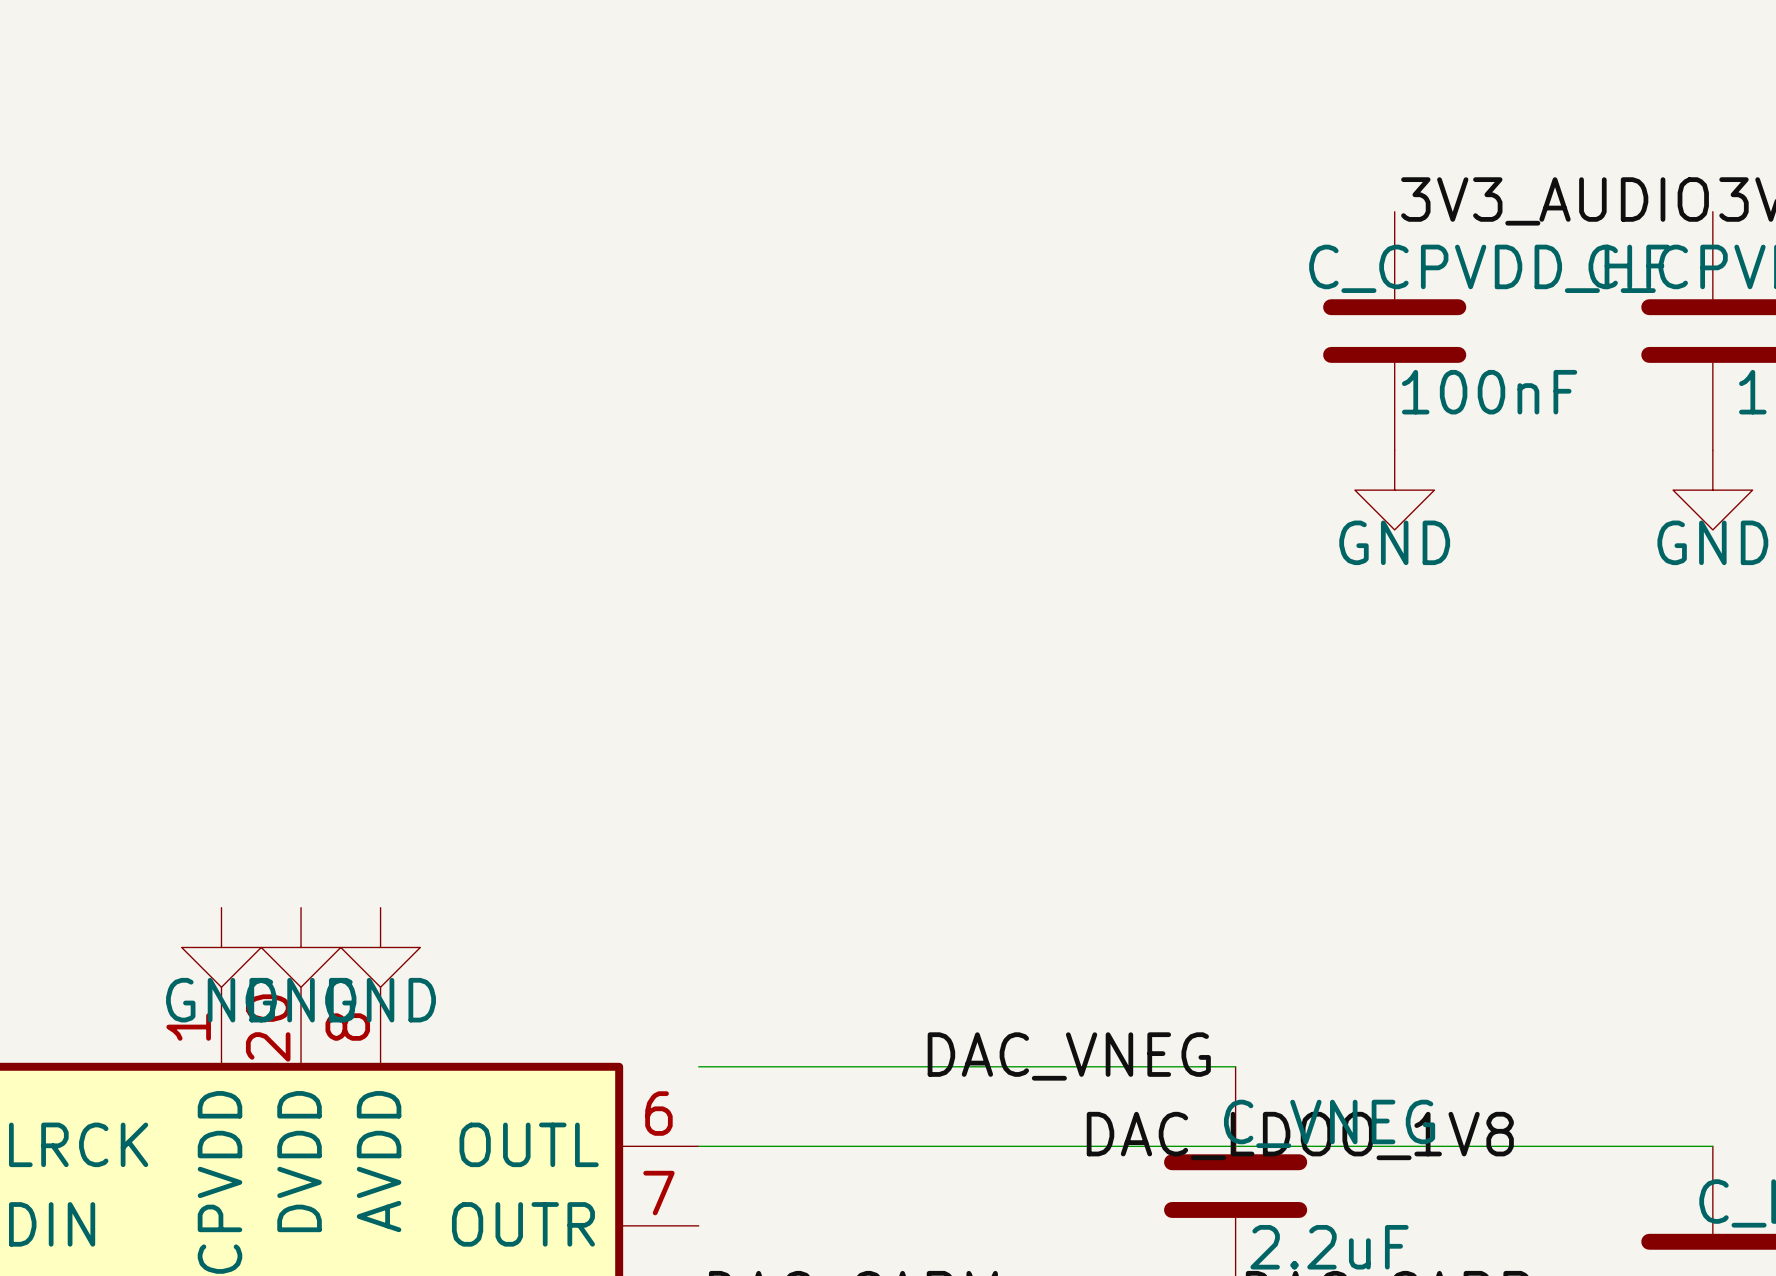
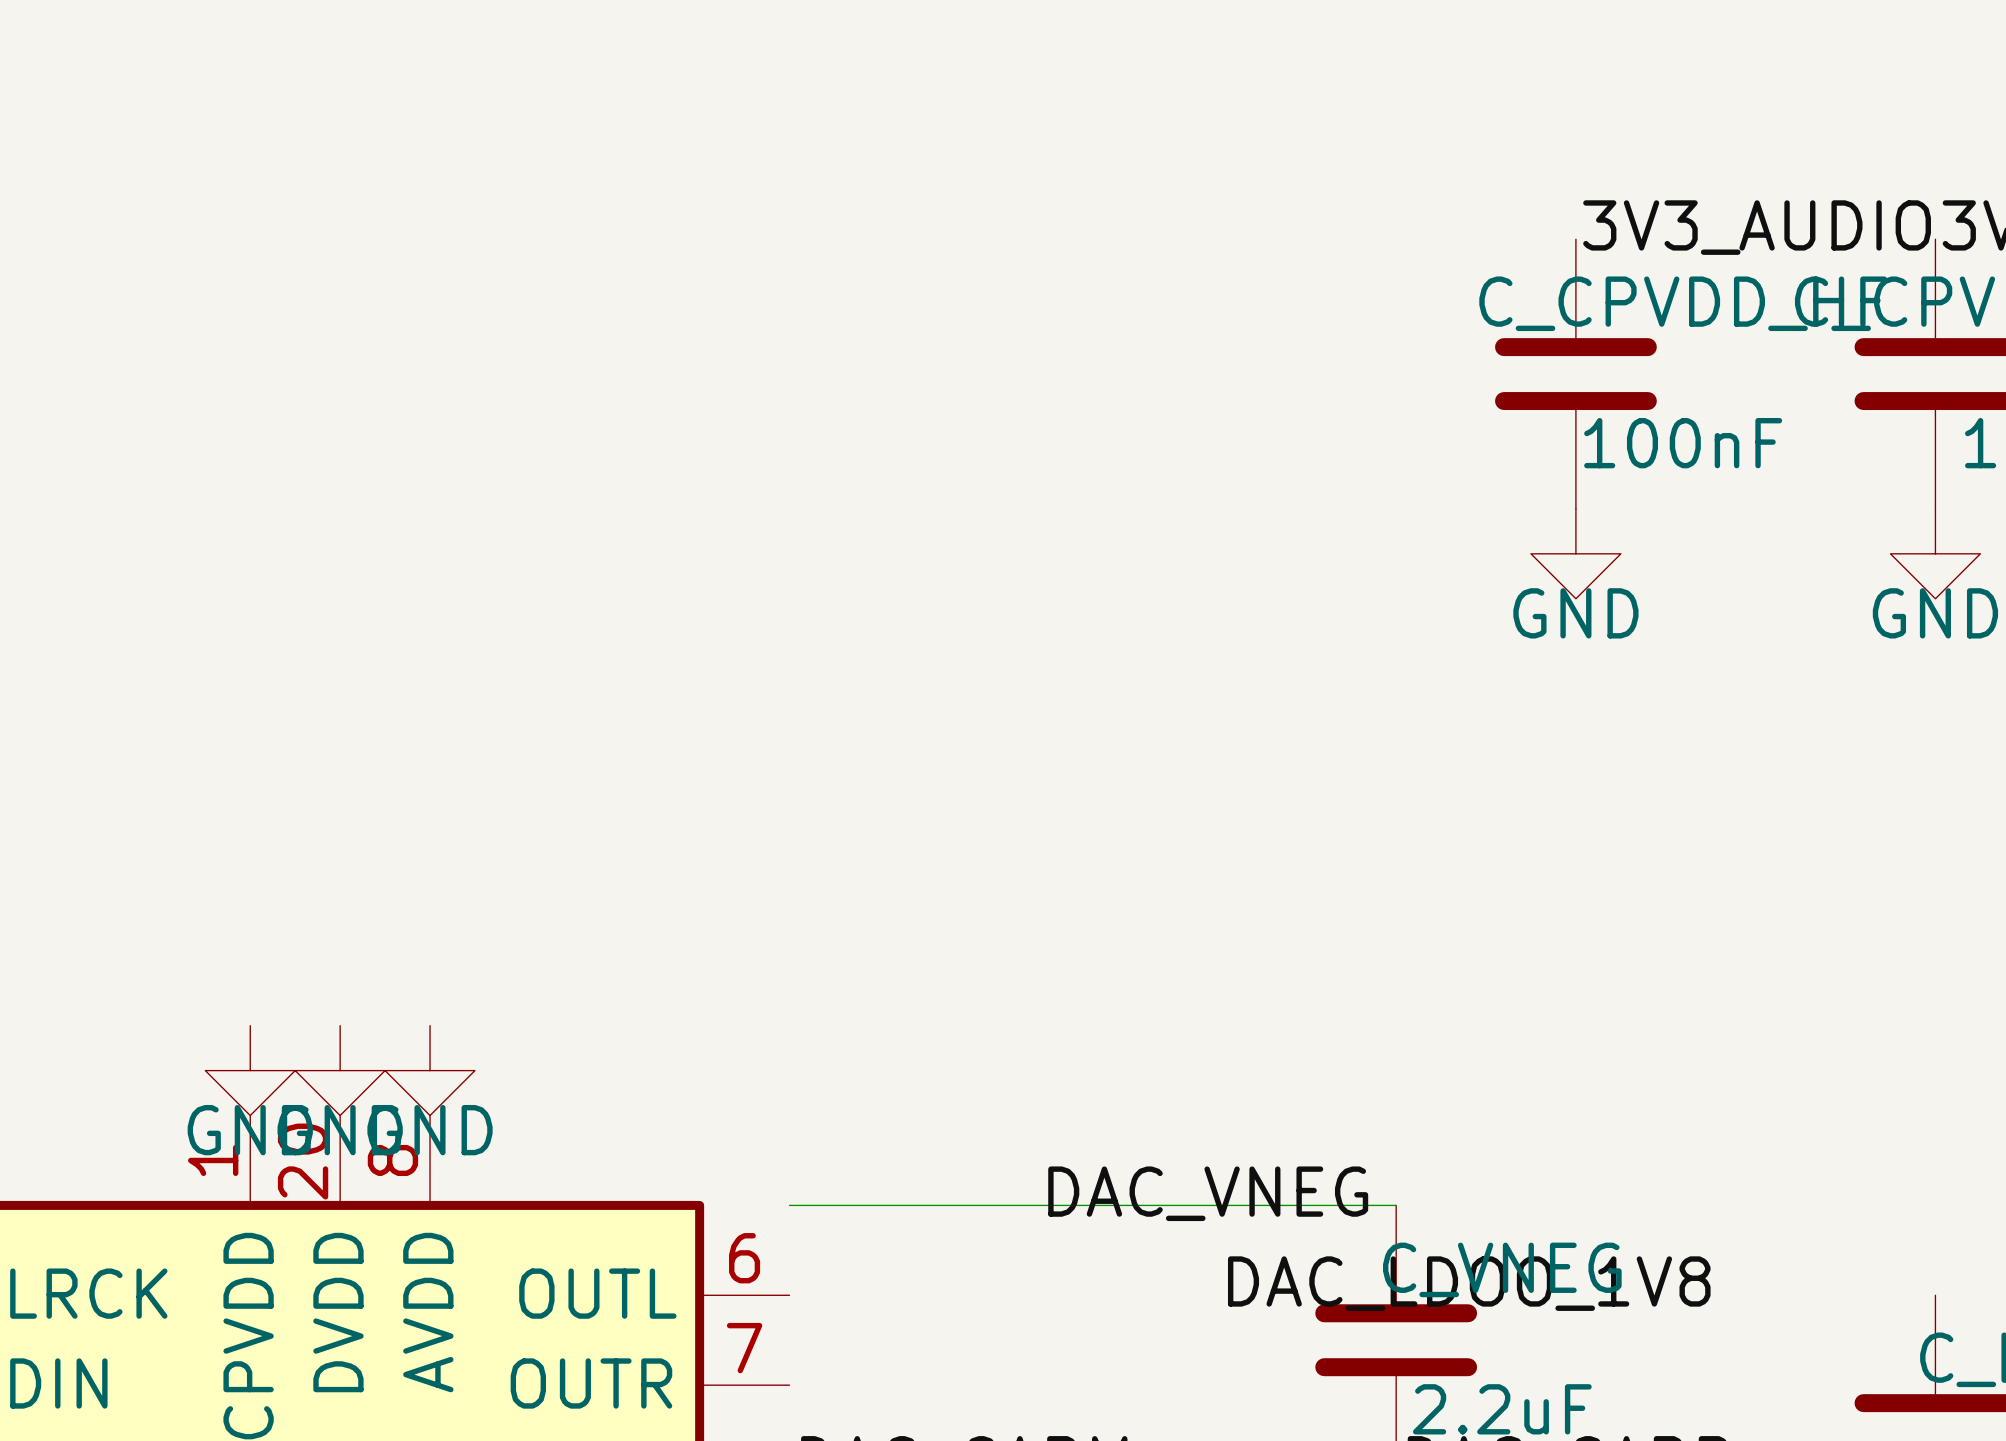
wire: (698, 1146) (1712, 1146) -> none

